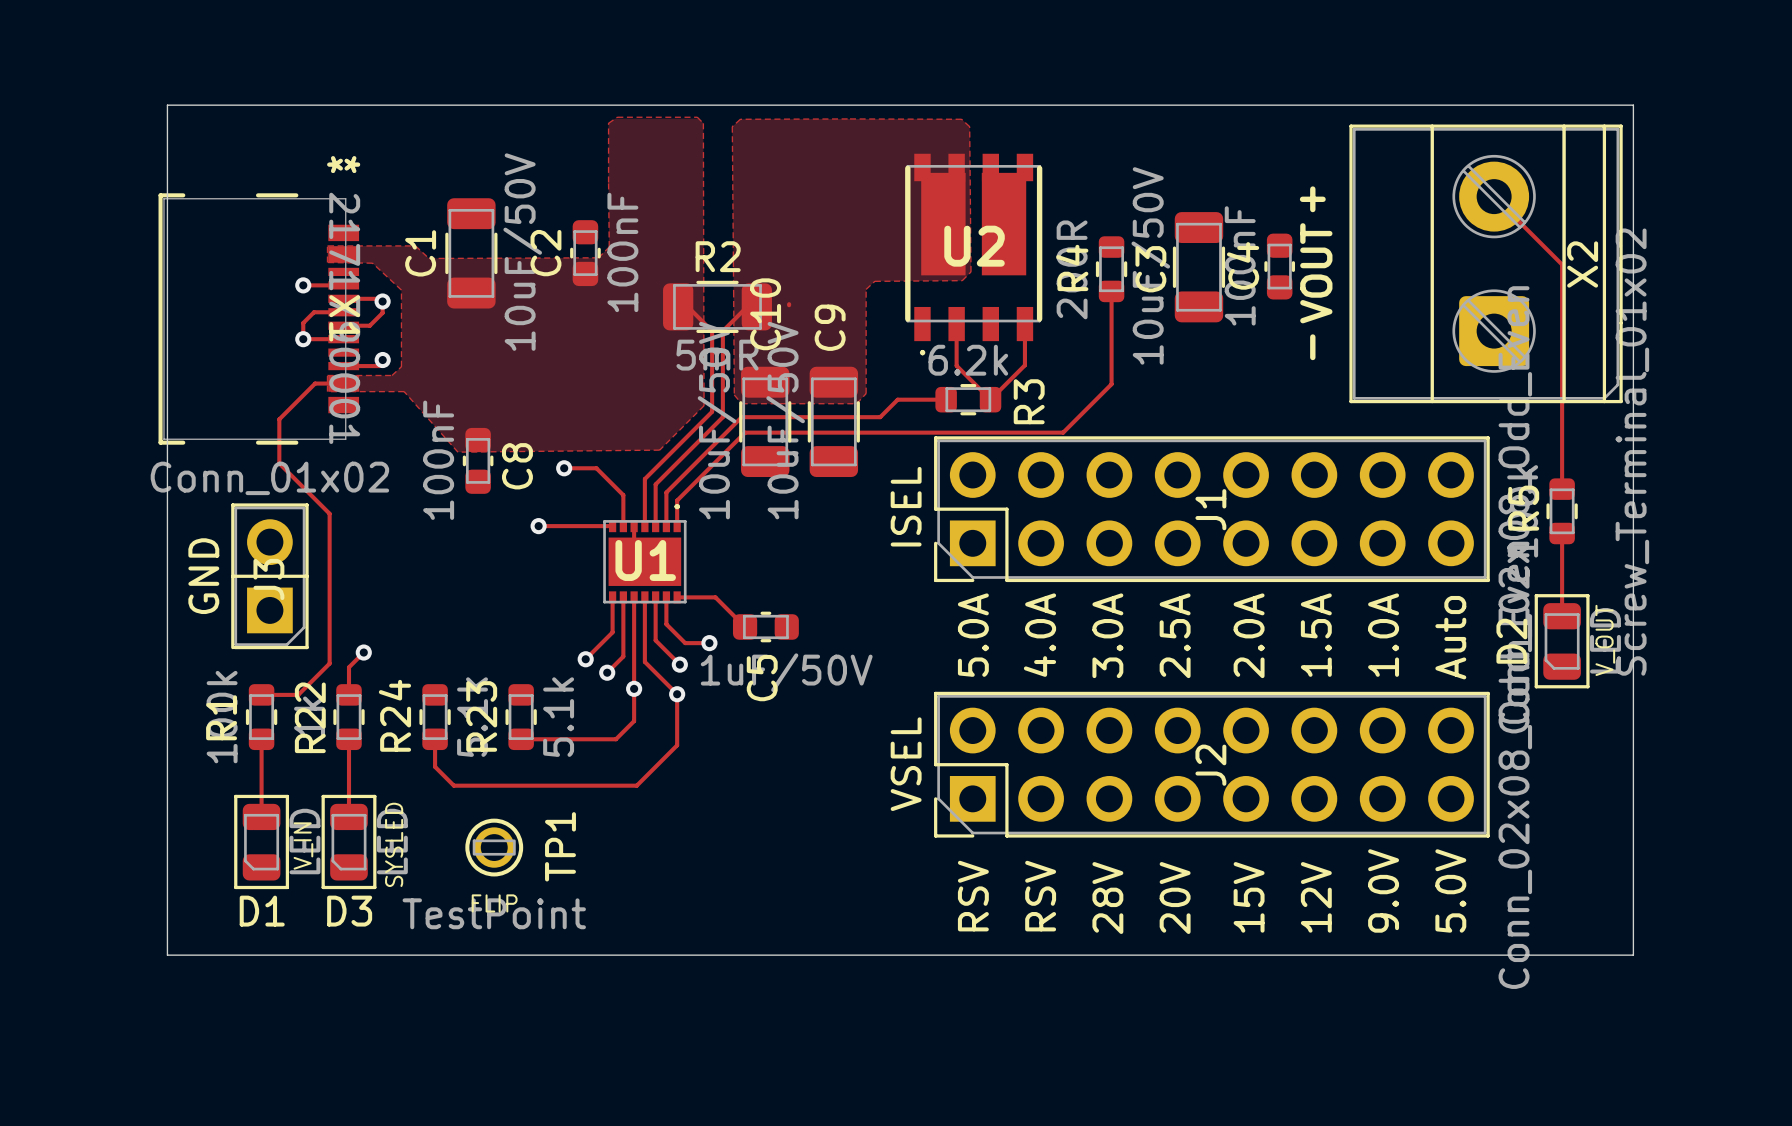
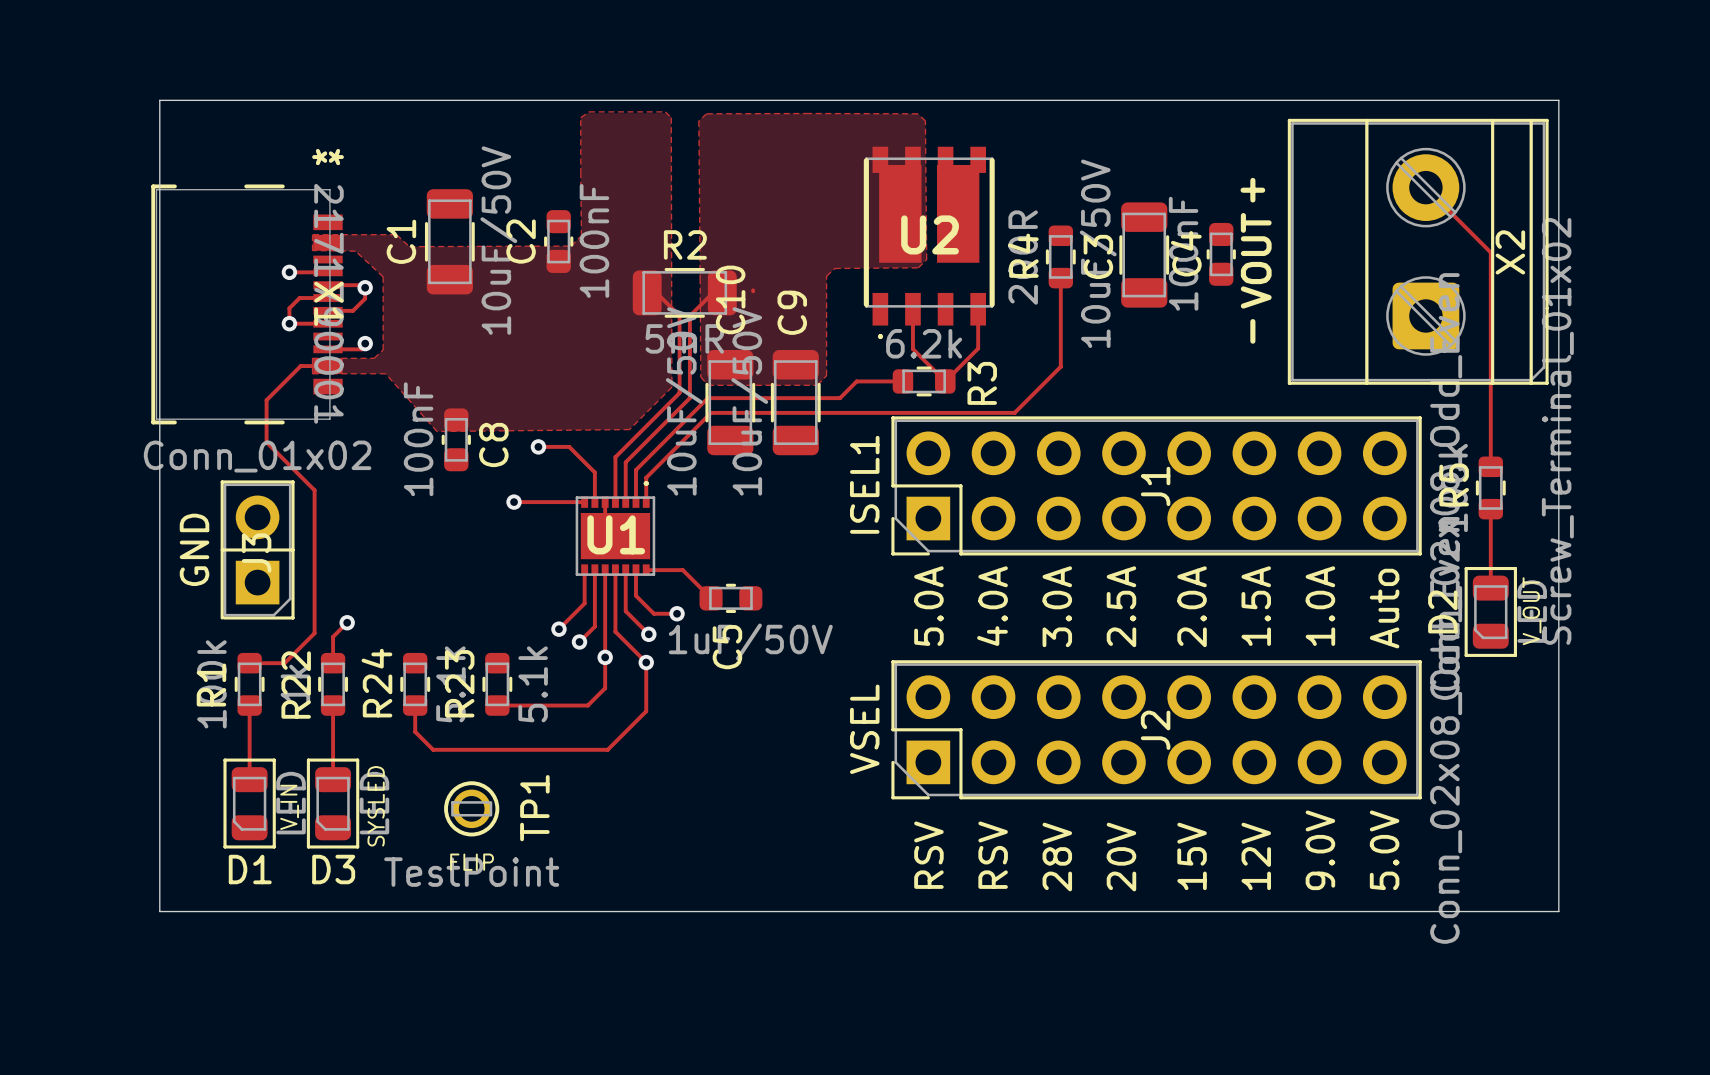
text: ISEL (906, 506) -> ISEL1 (864, 484)

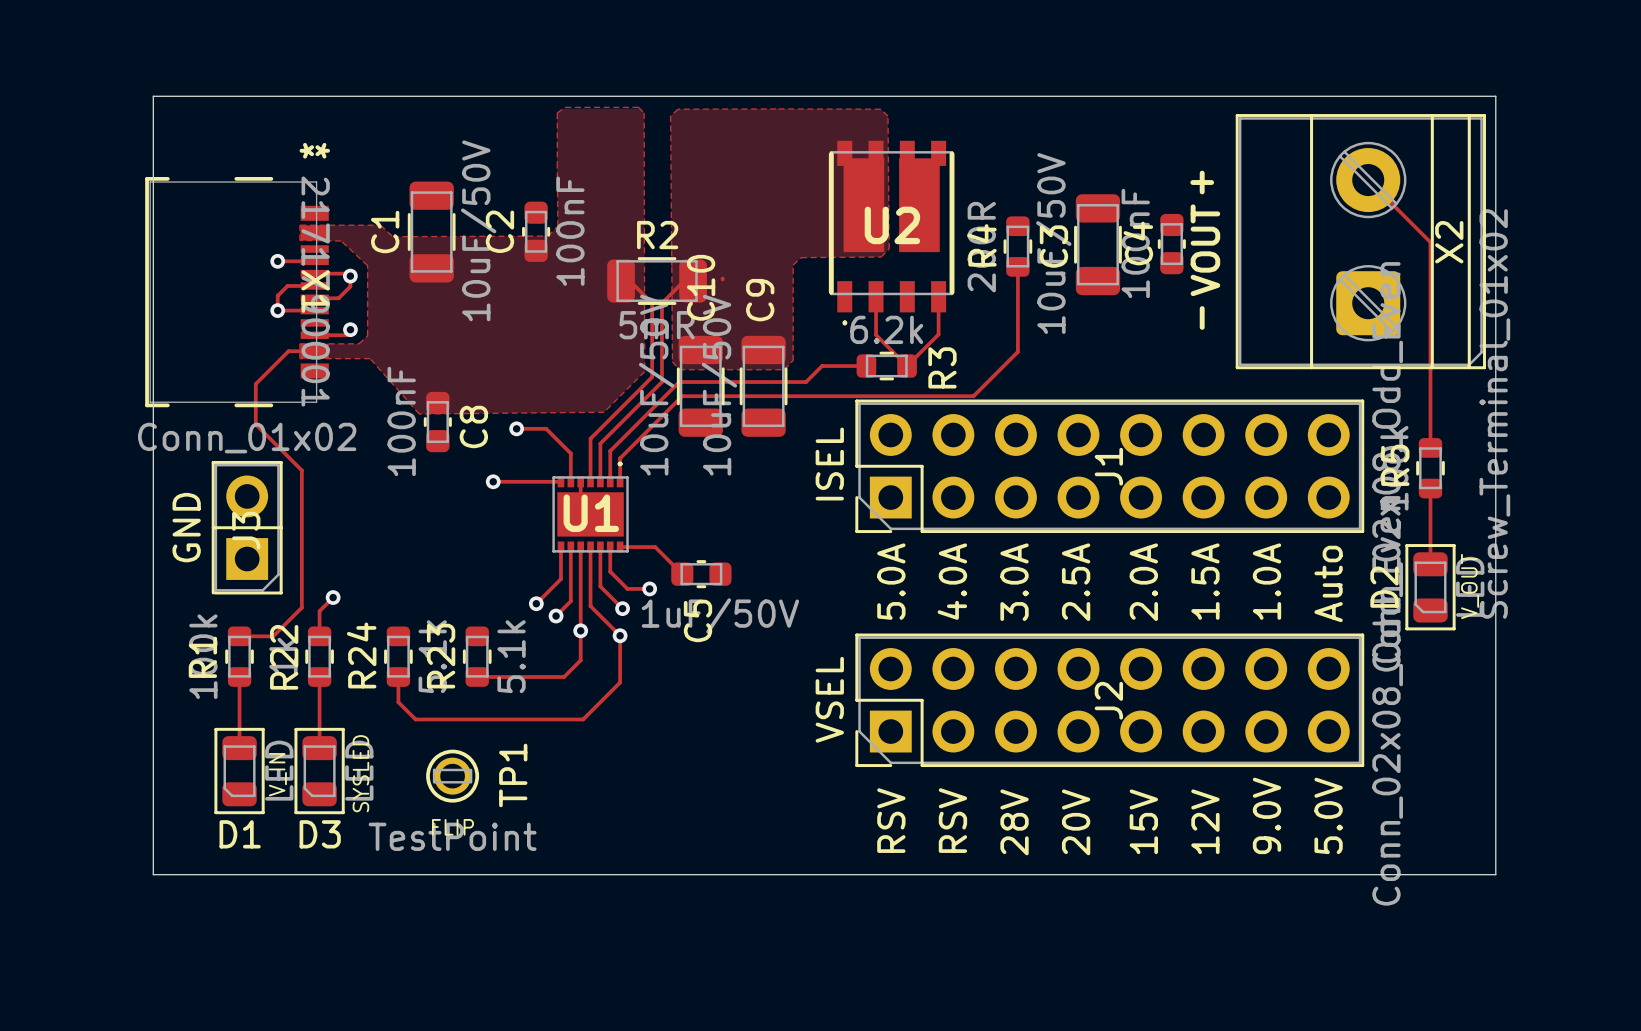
text: ISEL1 (864, 484) -> ISEL (829, 464)

